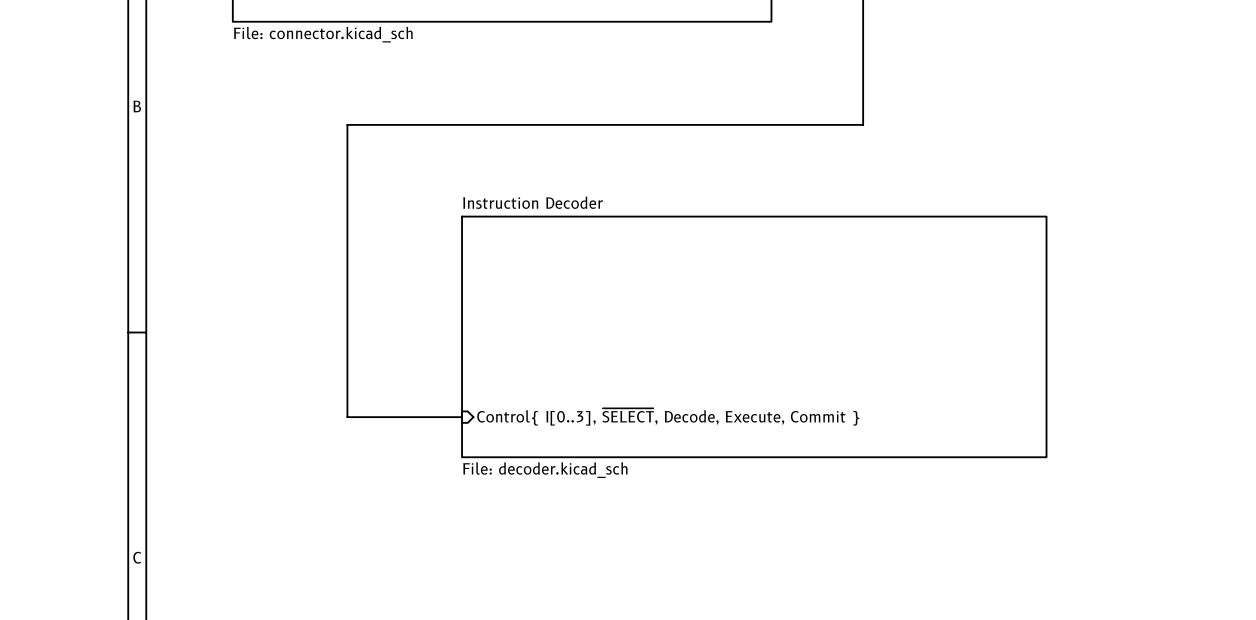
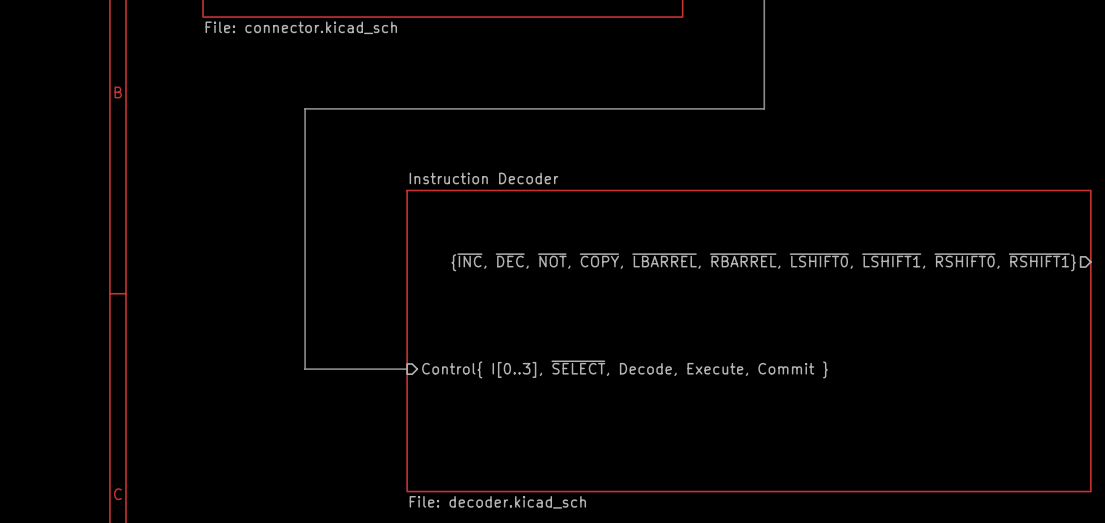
sheet pin: none -> {~{INC}, ~{DEC}, ~{NOT}, ~{COPY}, ~{LBARREL}, ~{RBARREL}, ~{LSHIFT0}, ~{LSHIFT1}, ~{RSHIFT0}, ~{RSHIFT1}} (763, 262)
sheet Instruction Decoder: File: decoder.kicad_sch (754, 336) -> none
sheet Instruction Decoder: none -> File: decoder.kicad_sch (748, 341)

